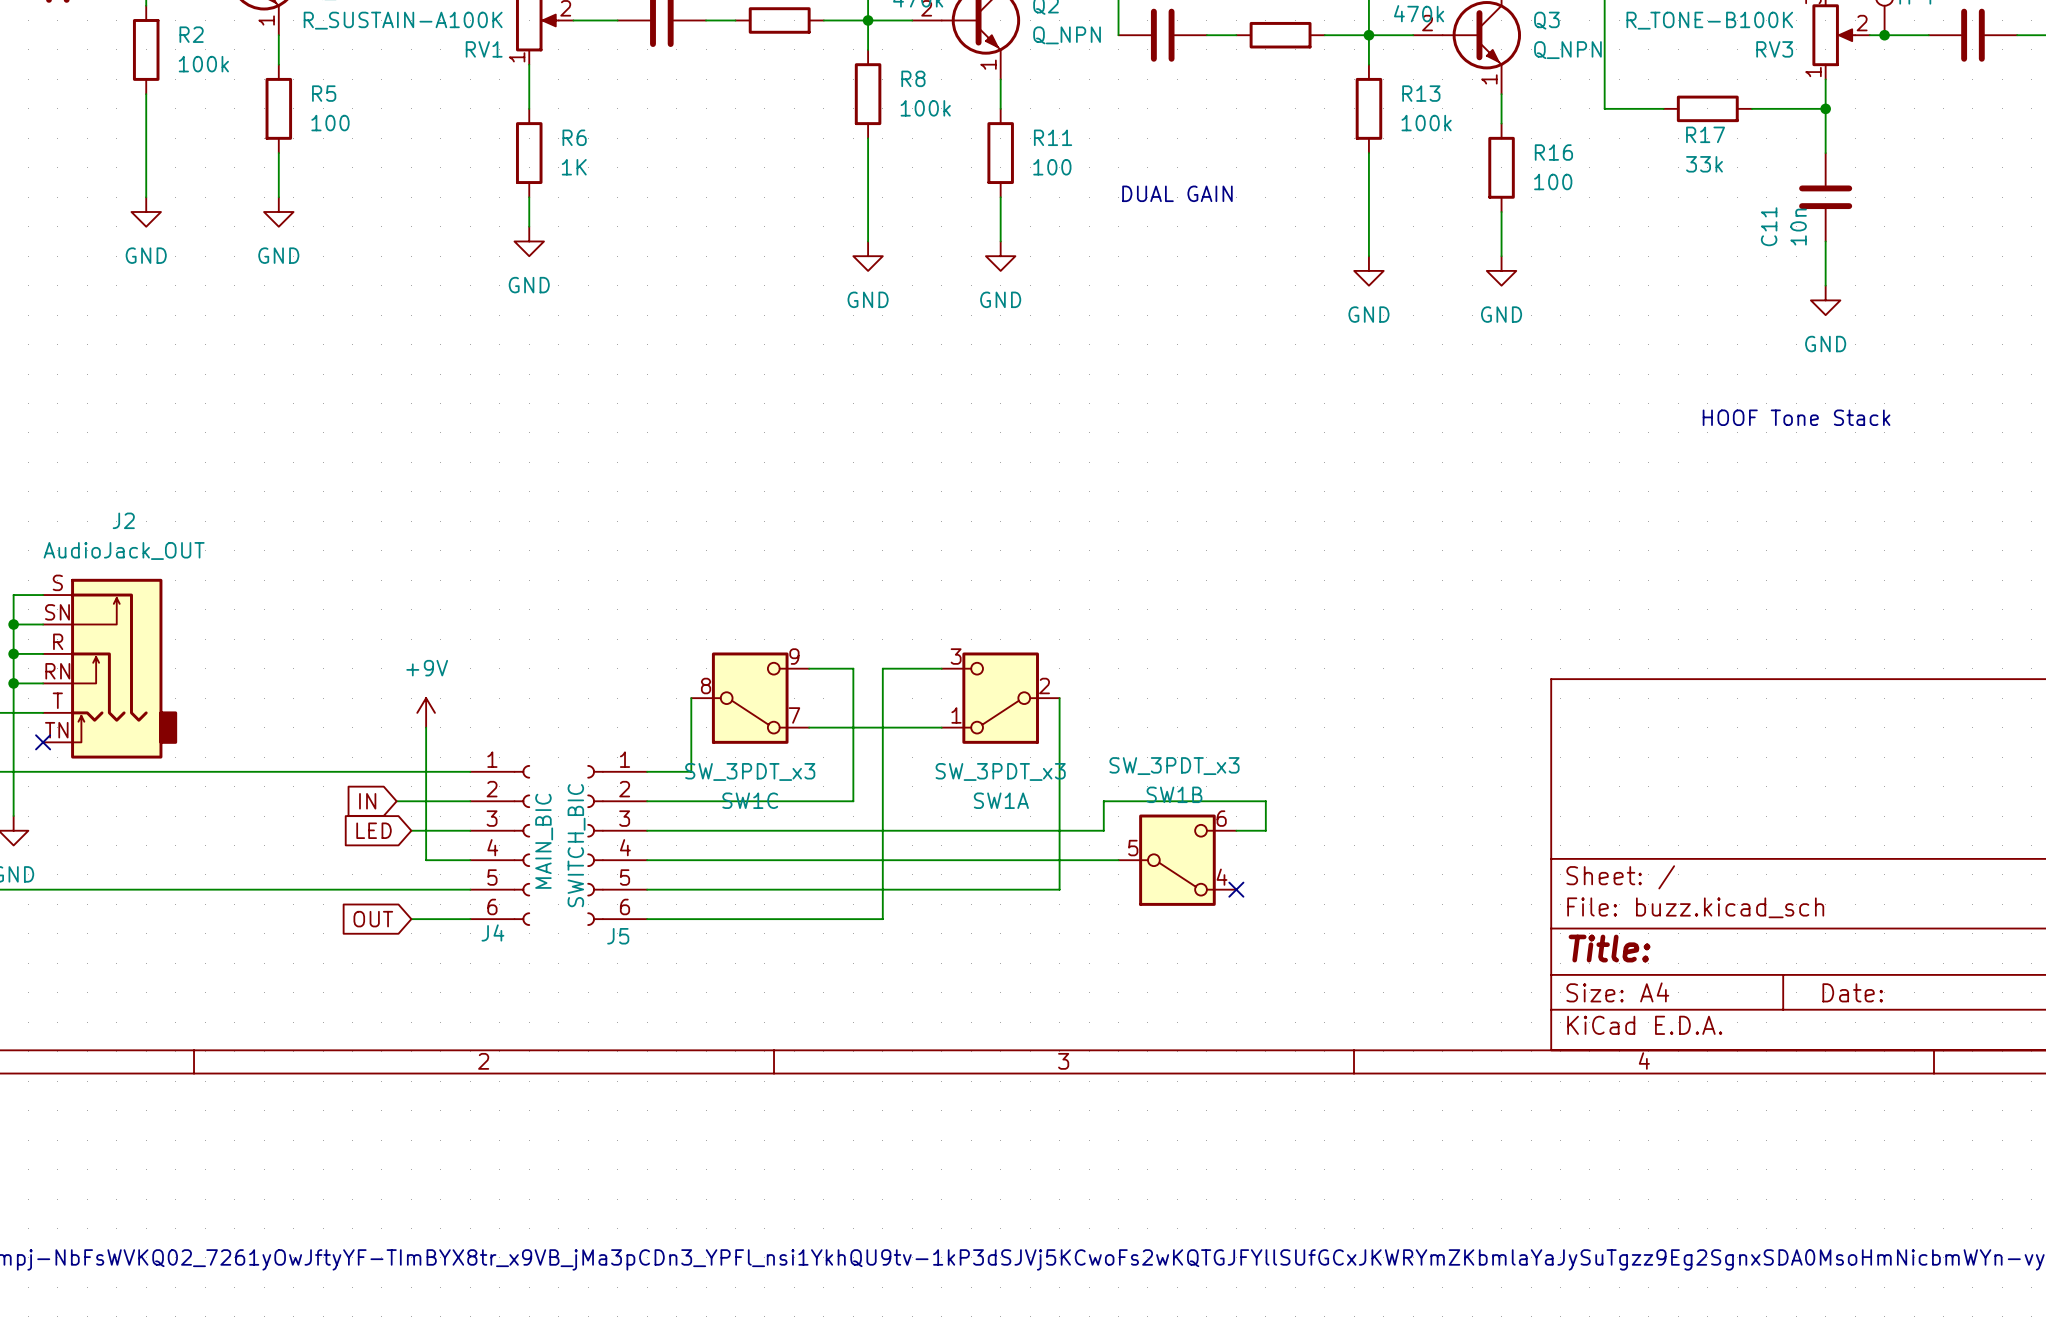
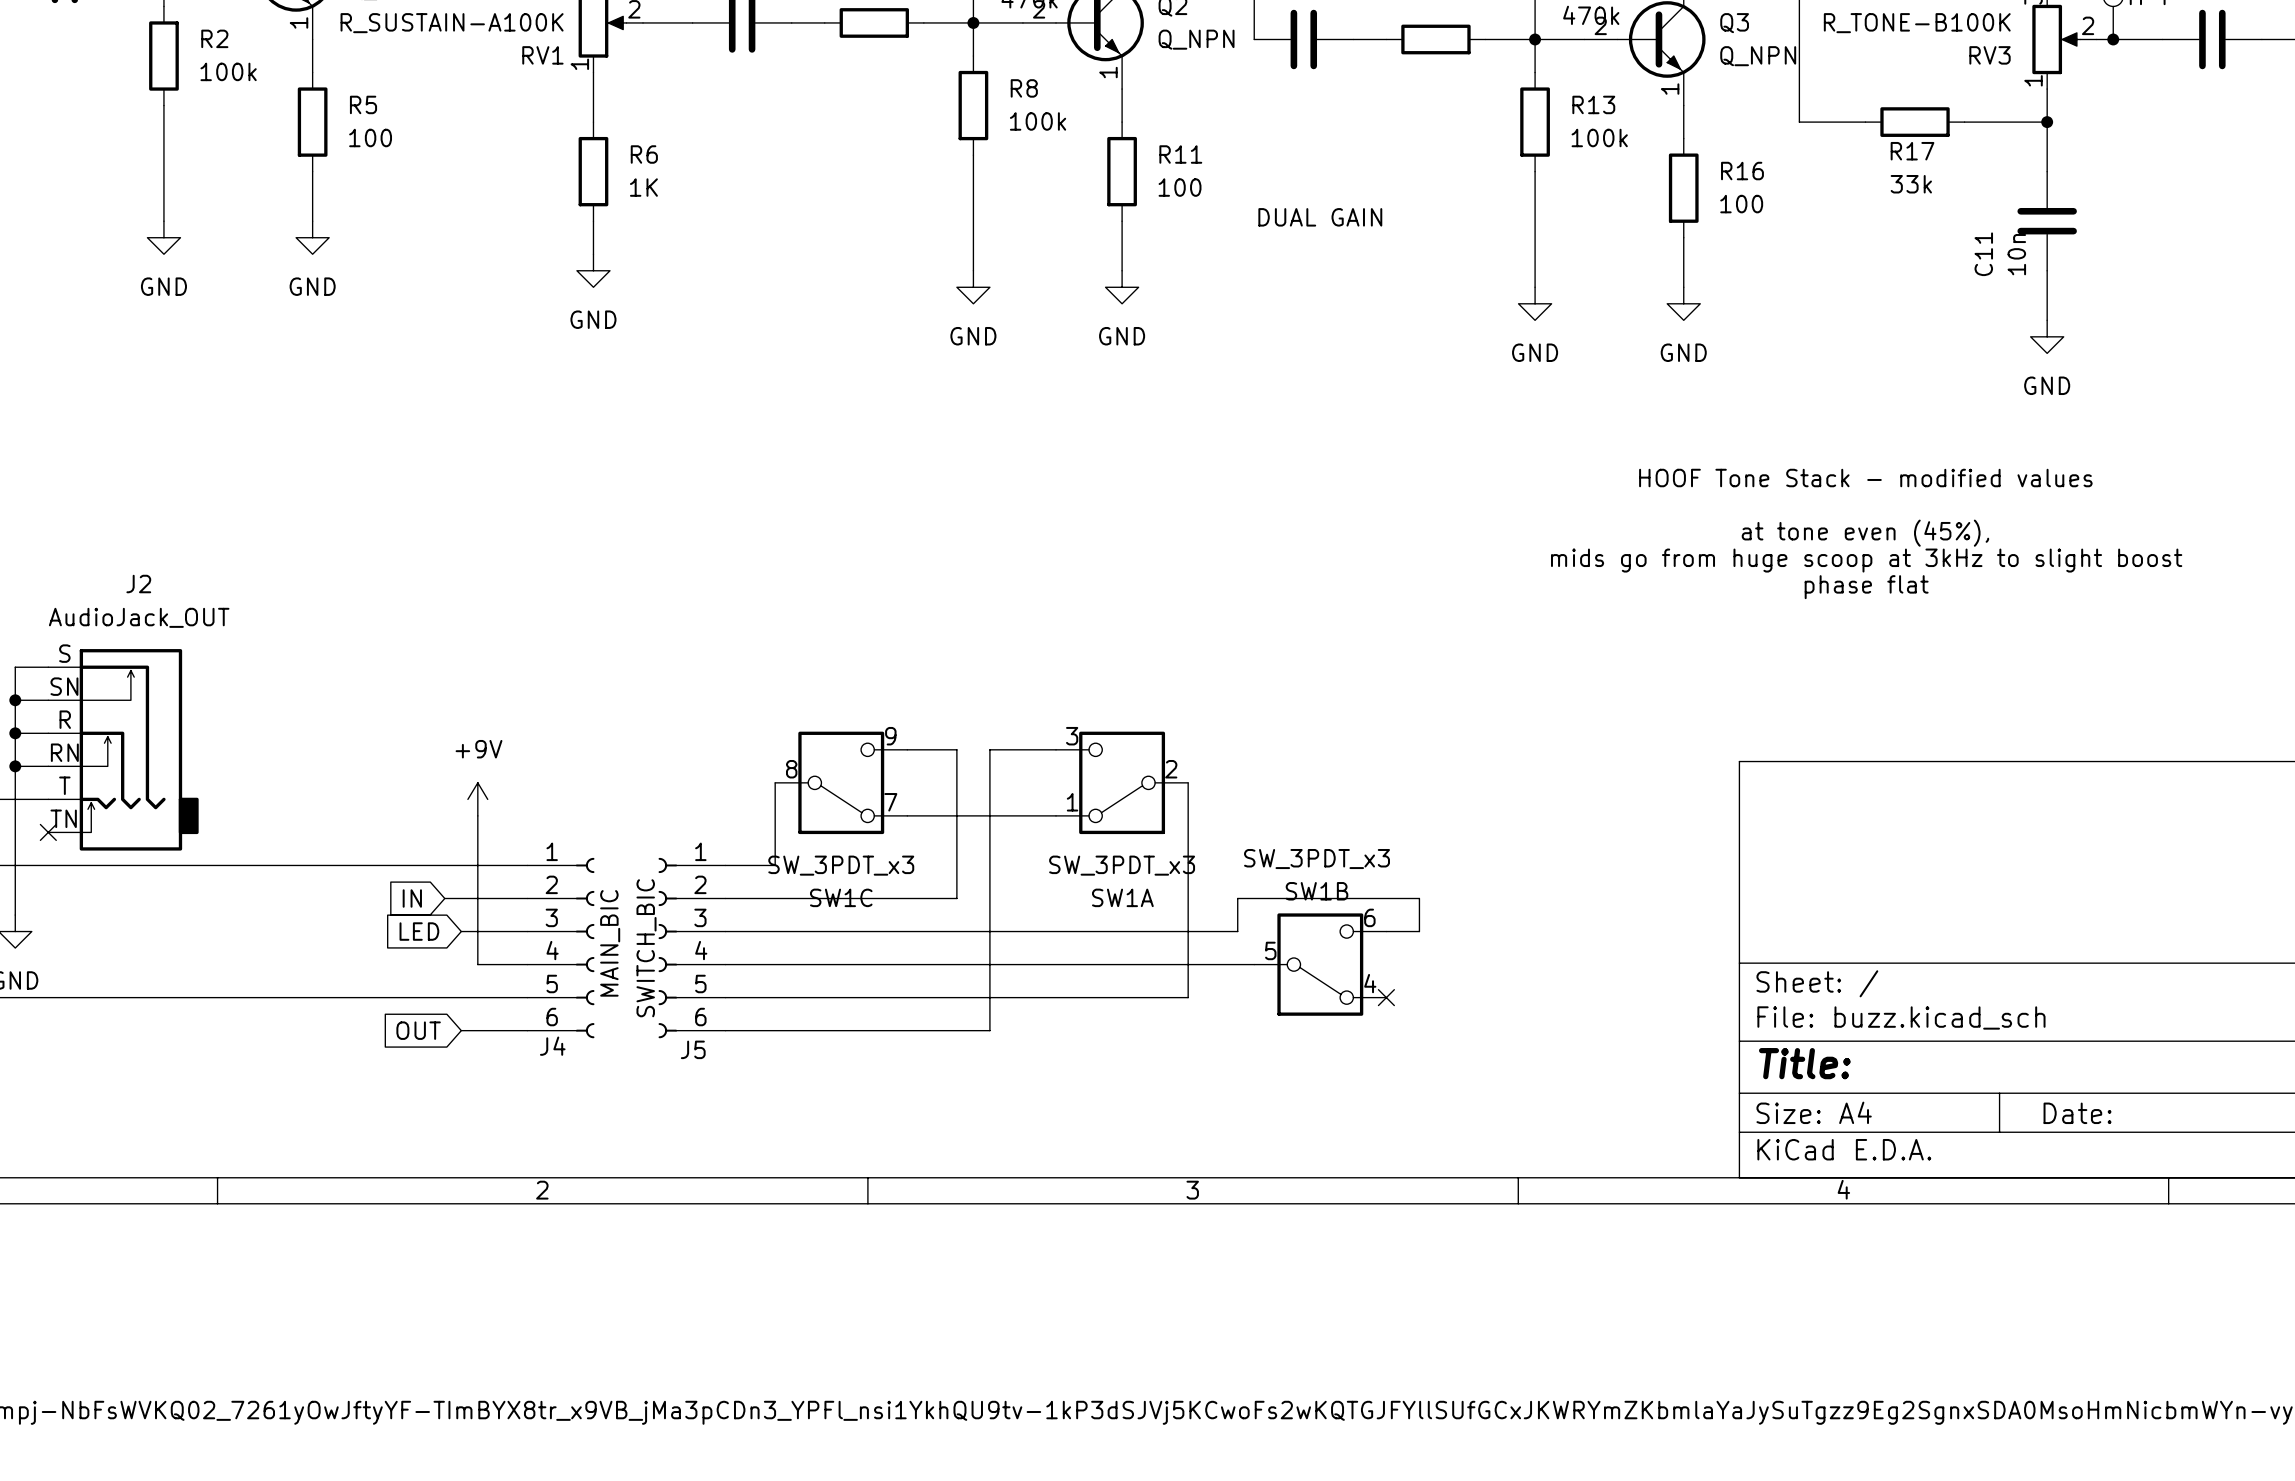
text: HOOF Tone Stack (1796, 417) -> HOOF Tone Stack - modified values (1865, 478)
text: none -> at tone even (45%), (1865, 533)
text: none -> mids go from huge scoop at 3kHz to slight boost (1866, 560)
text: none -> phase flat (1866, 587)

